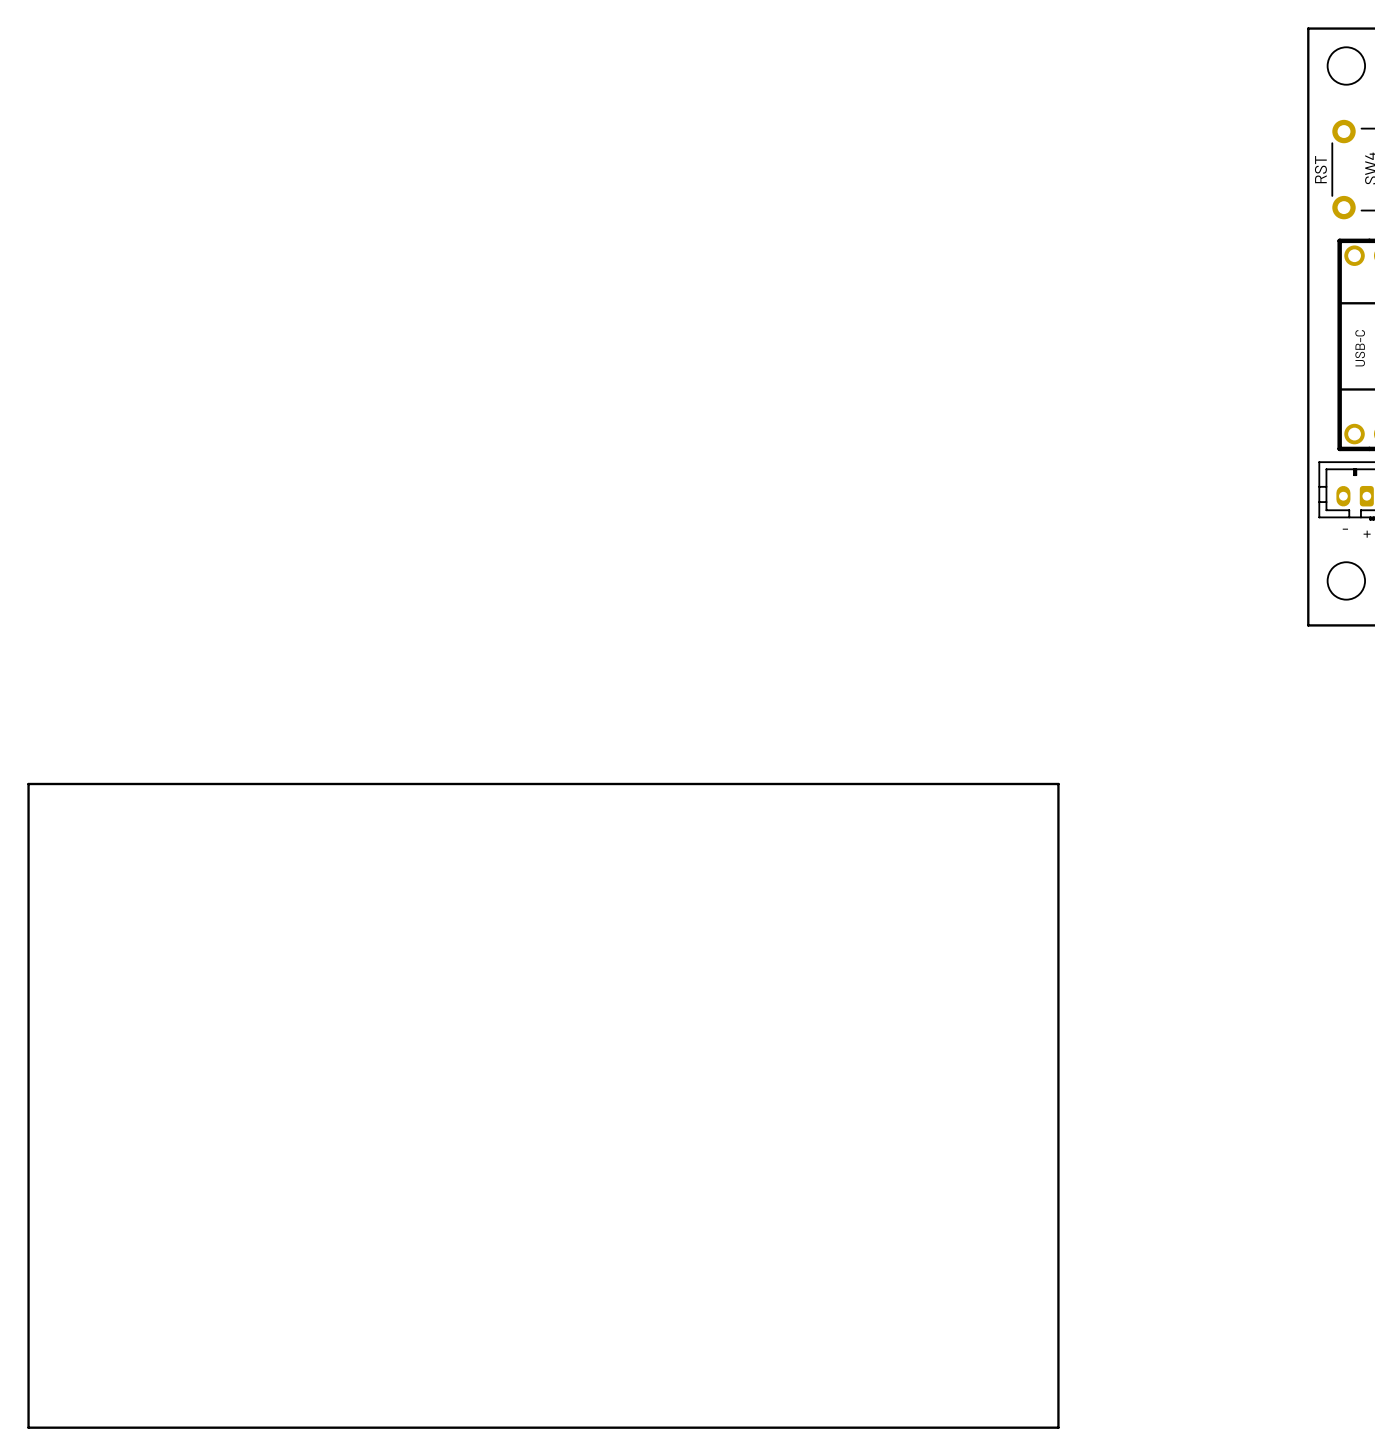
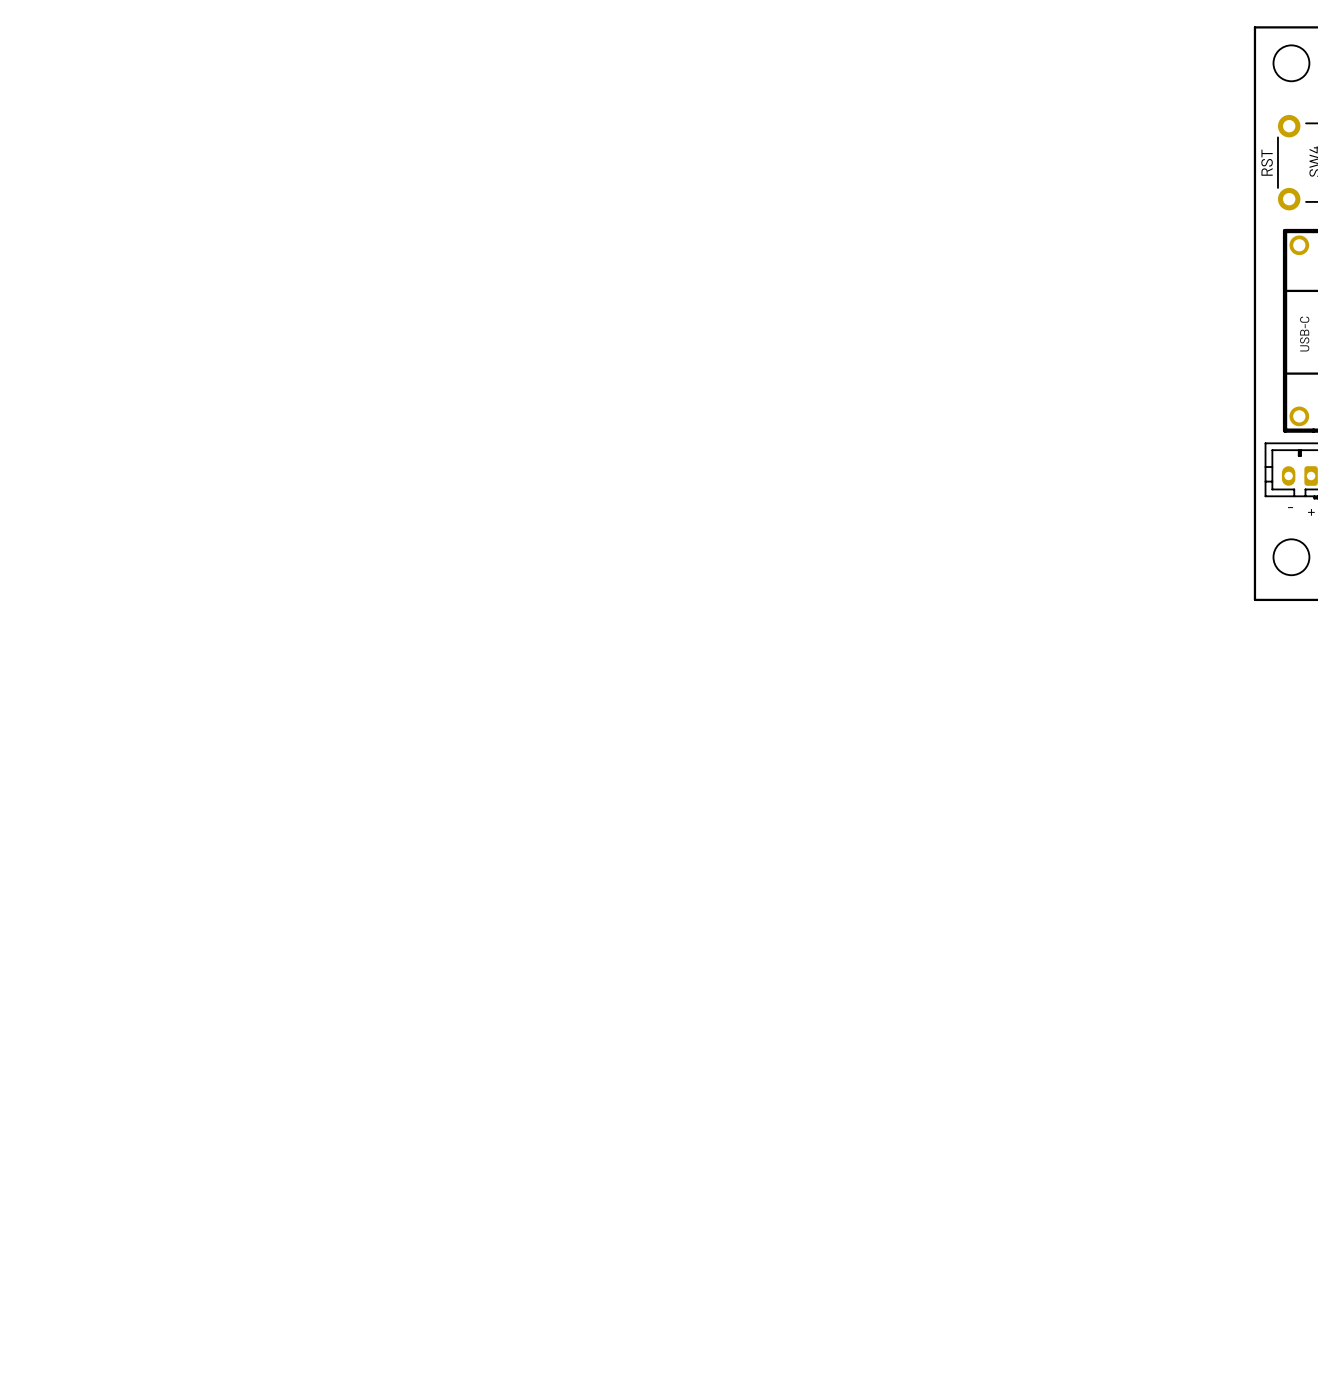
line: (28, 784) (1058, 784) (1058, 1427) (28, 1427) (28, 784) -> none

